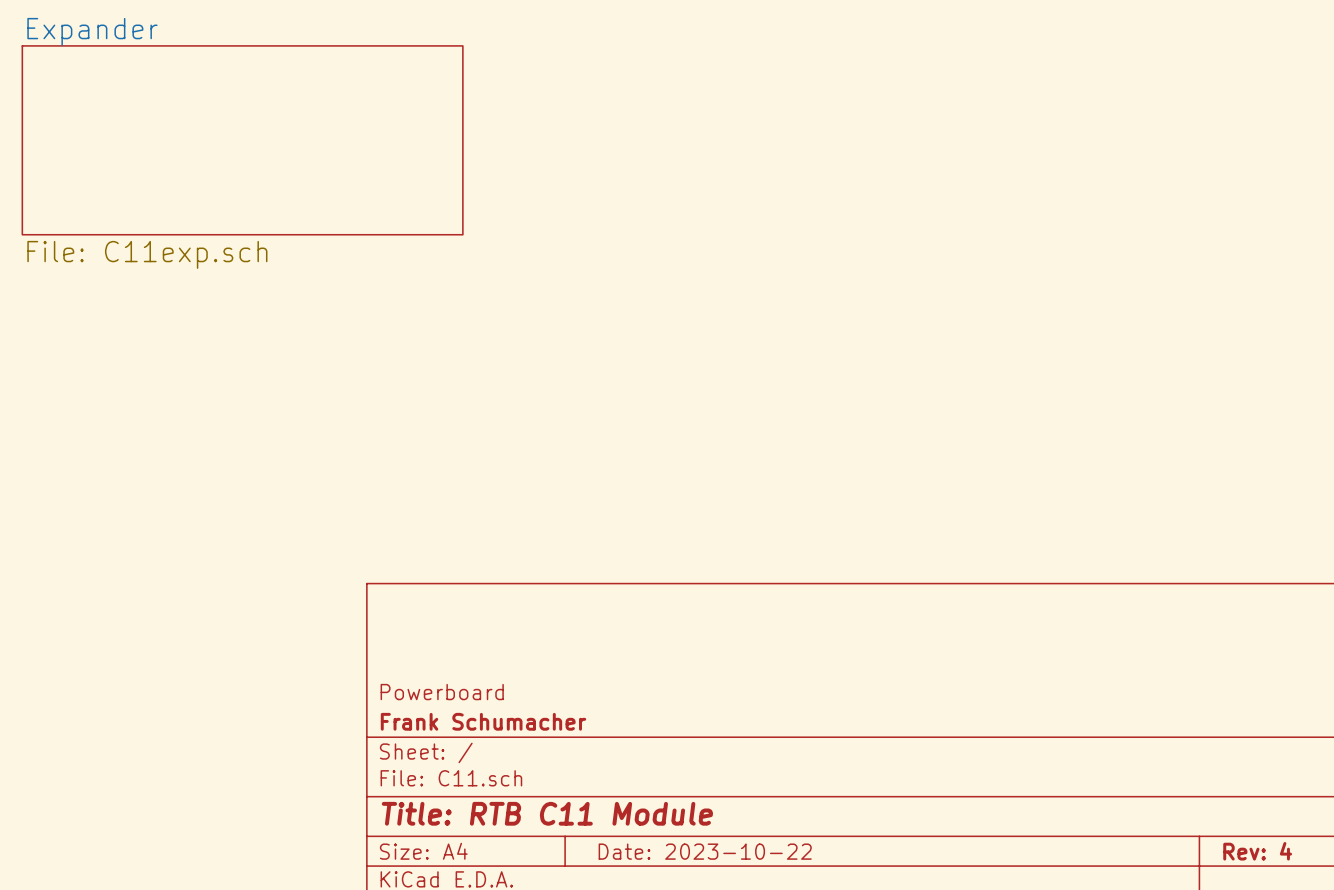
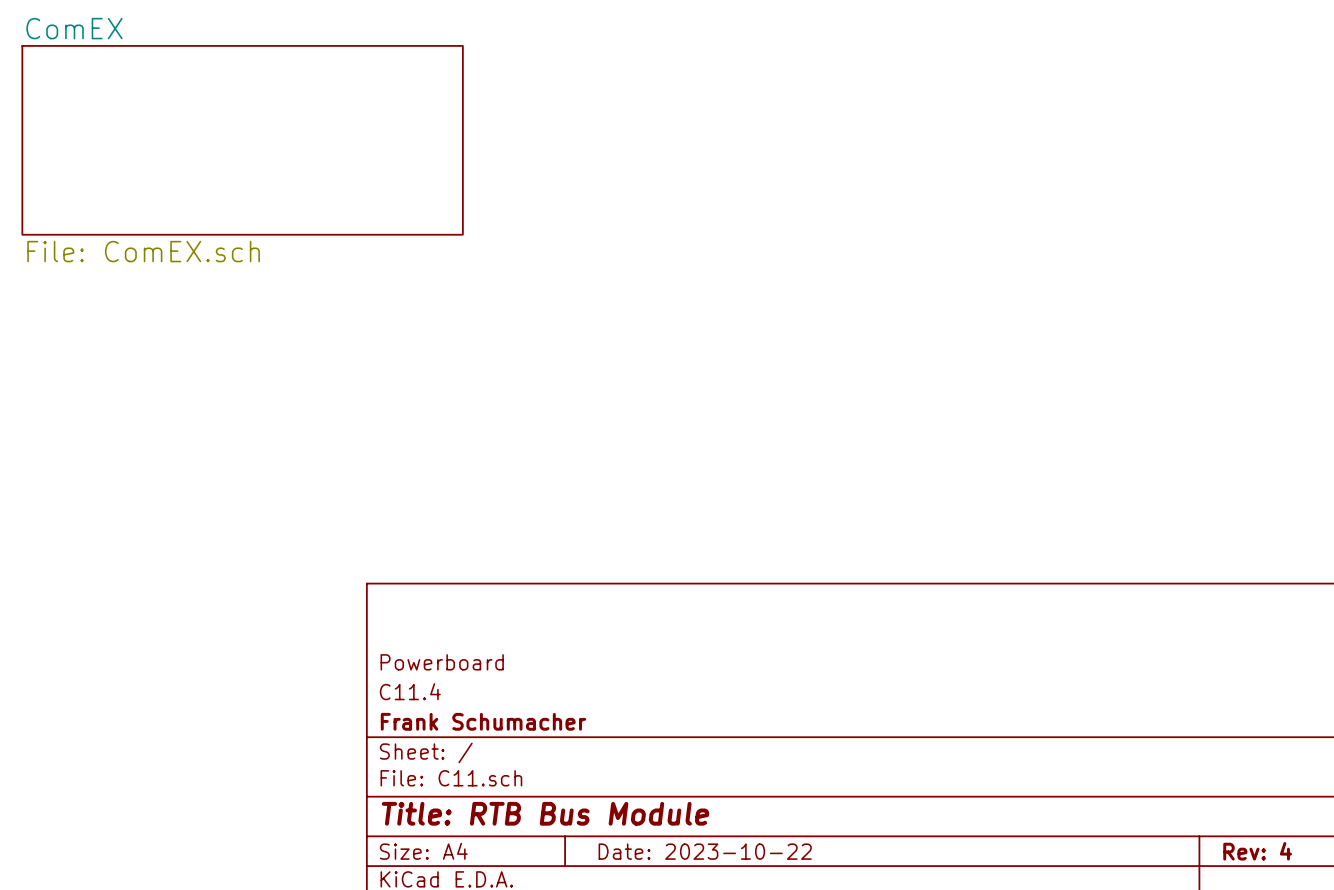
sheet Expander name: Expander (92, 31) -> ComEX (74, 28)
sheet Expander value: File: C11exp.sch (147, 254) -> File: ComEX.sch (143, 251)
title block: none -> Powerboard (442, 662)
title block: Powerboard (442, 692) -> C11.4 (410, 691)
title block: Title: RTB C11 Module (547, 813) -> Title: RTB Bus Module (545, 813)

